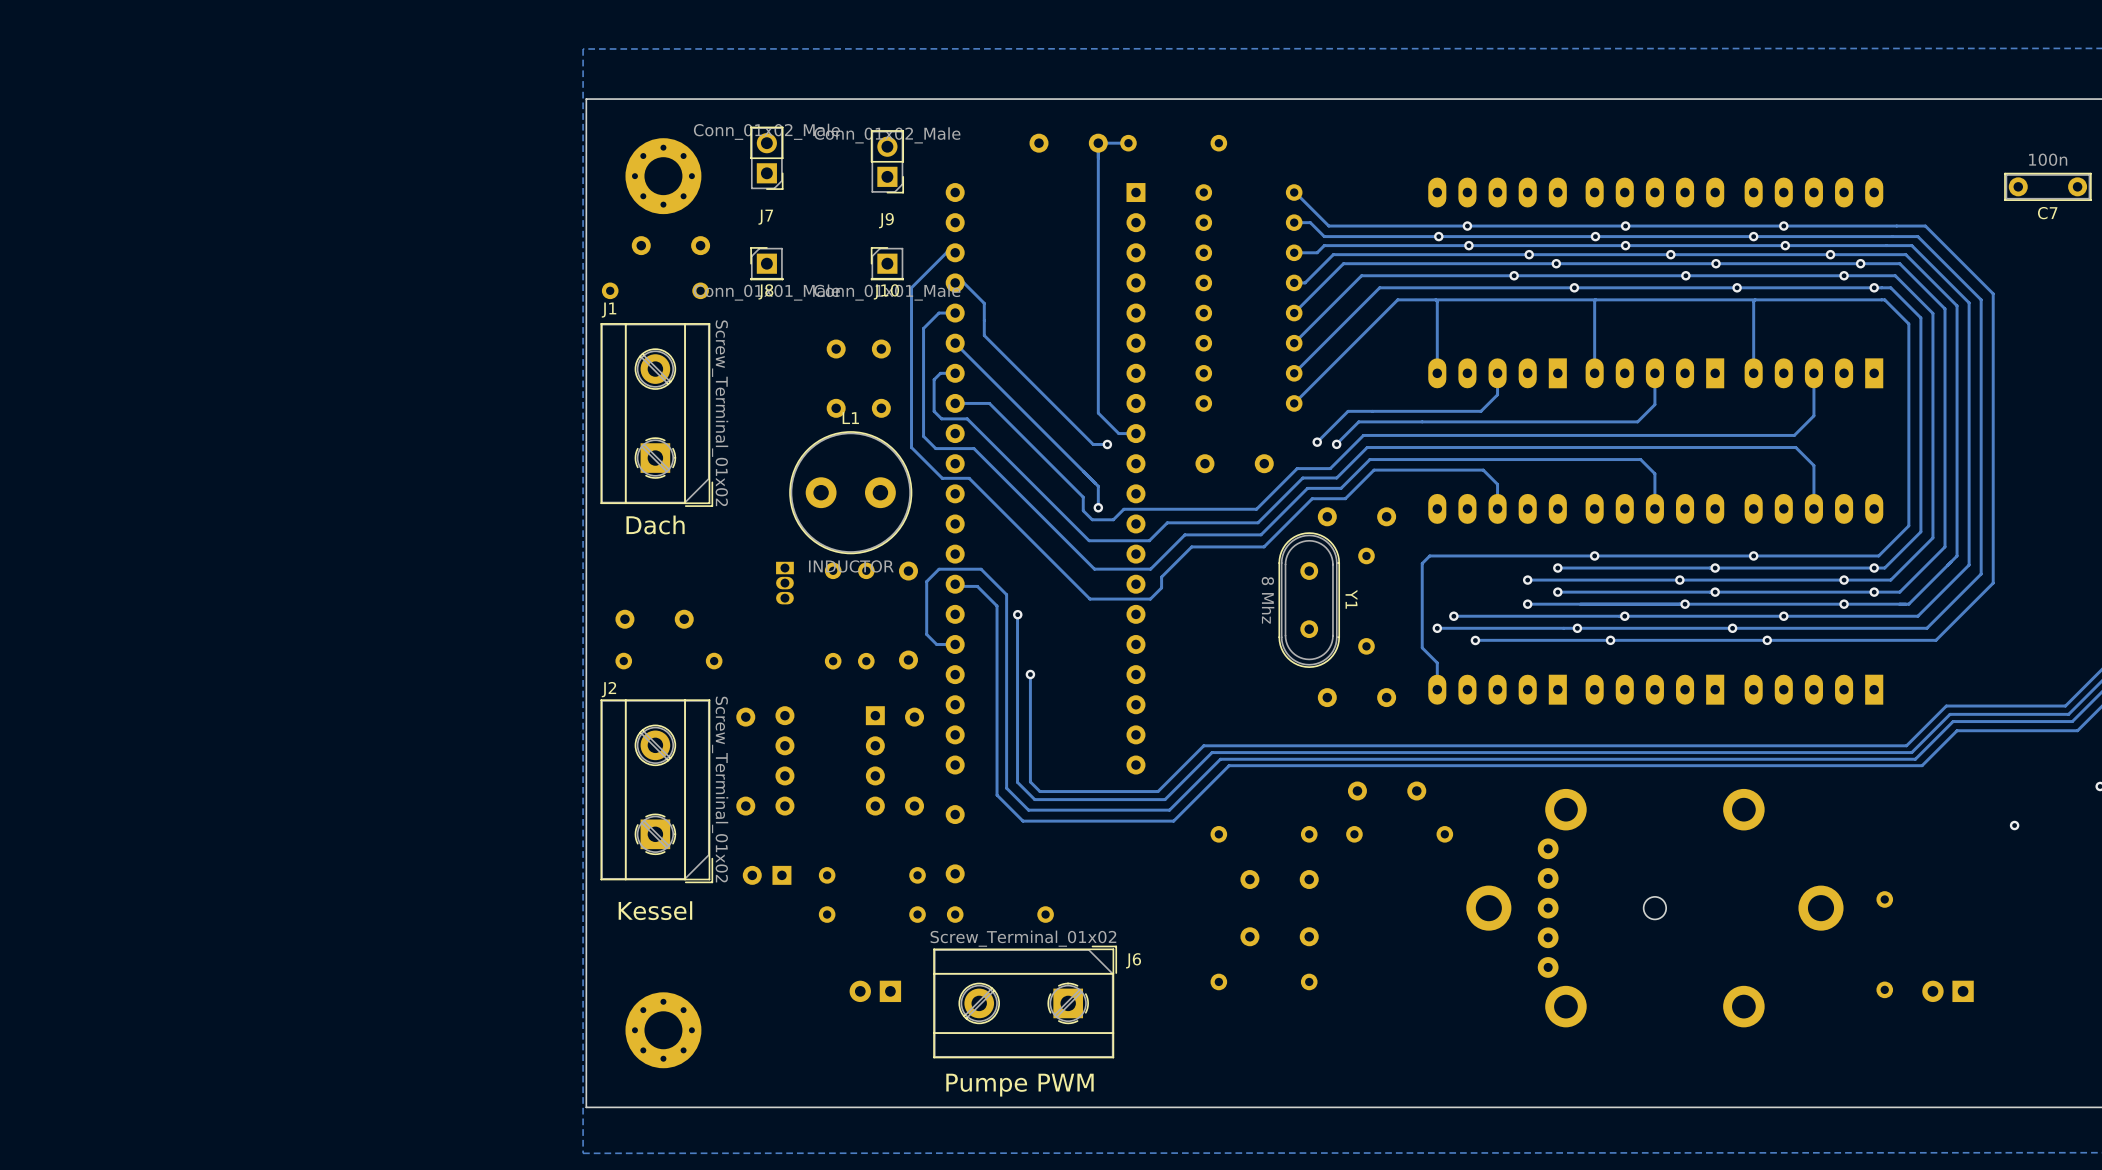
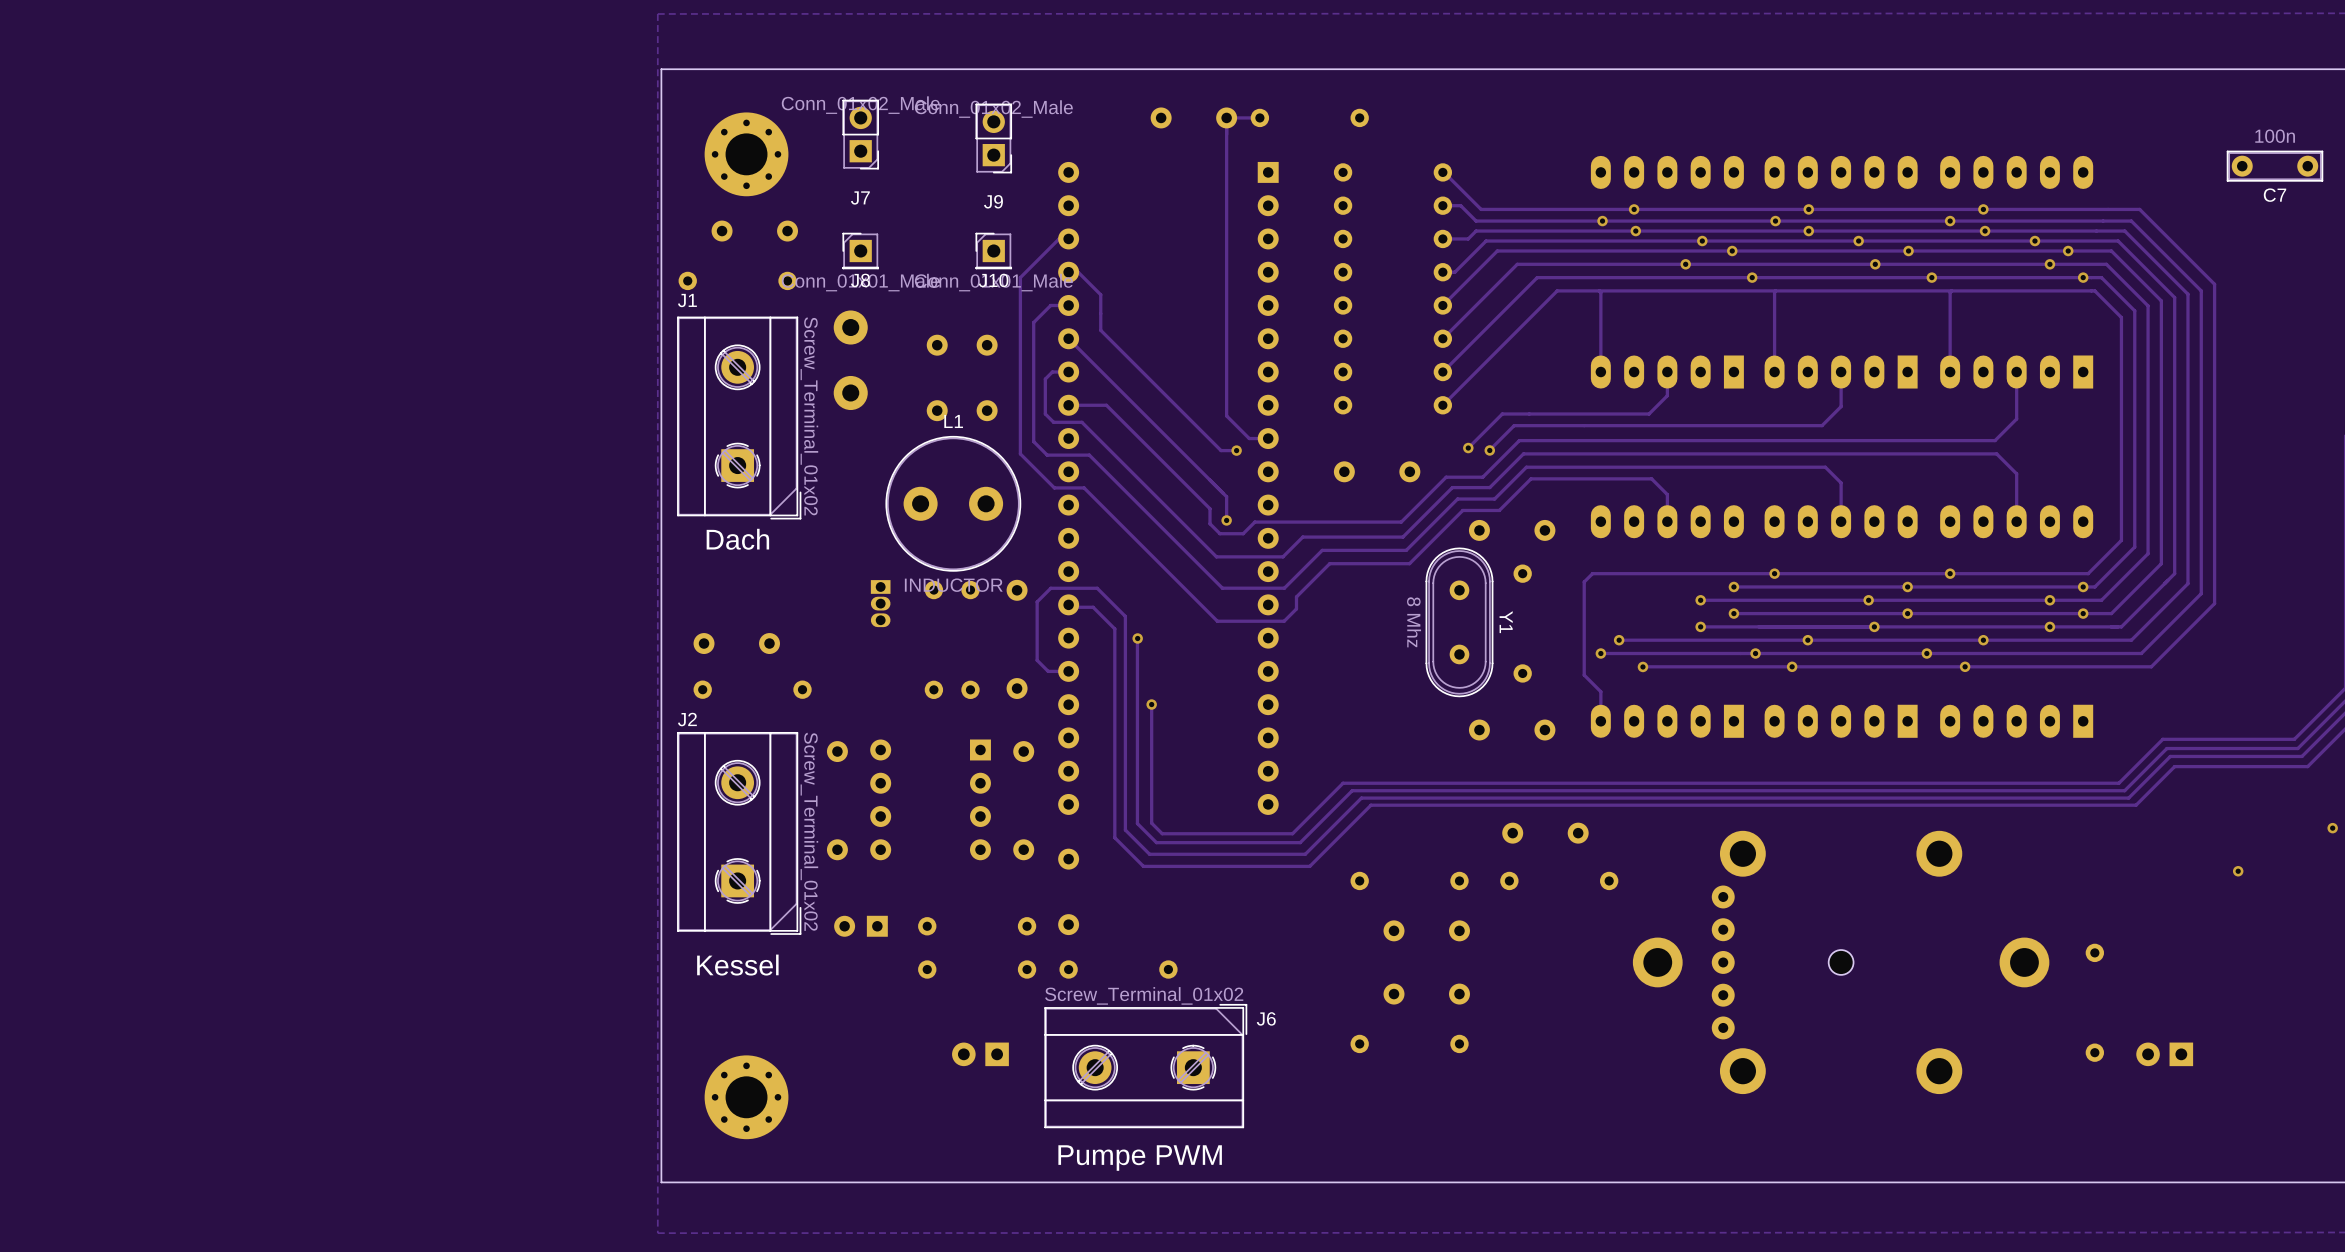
part: none -> (850, 360)

